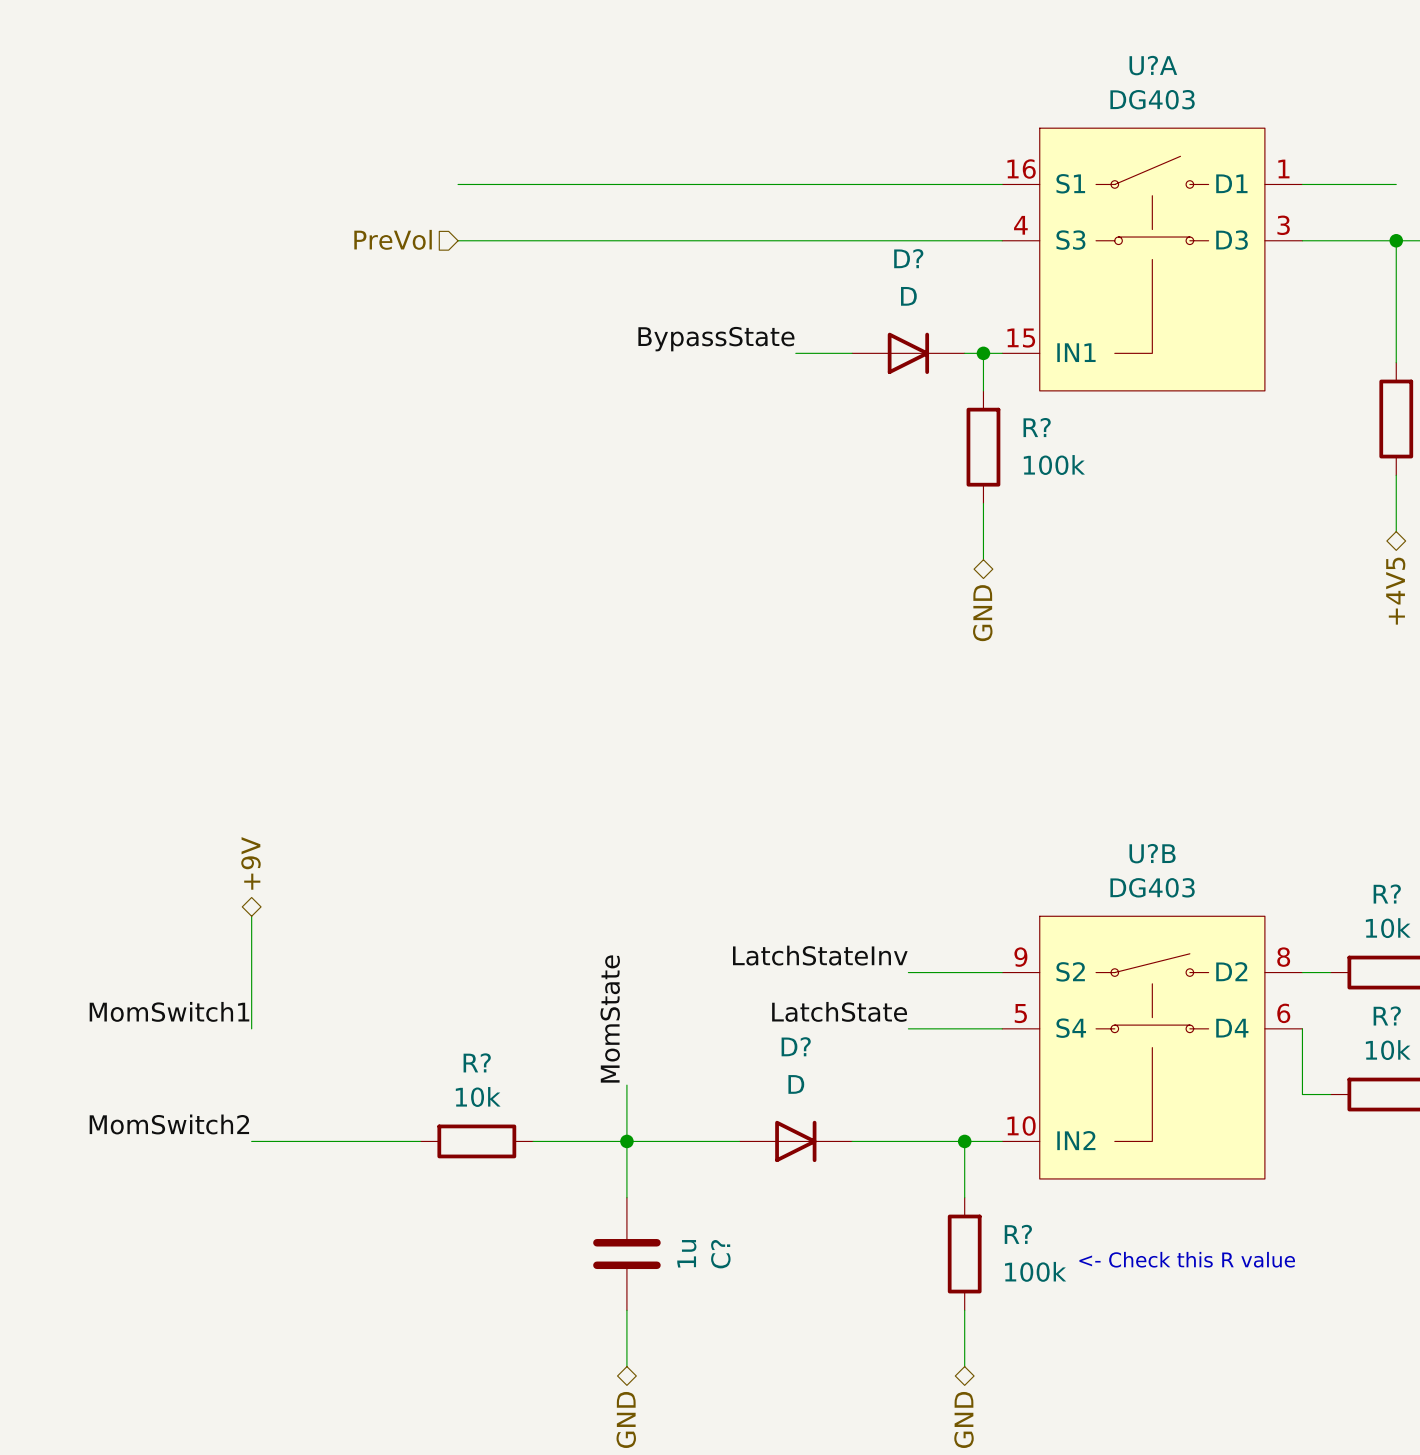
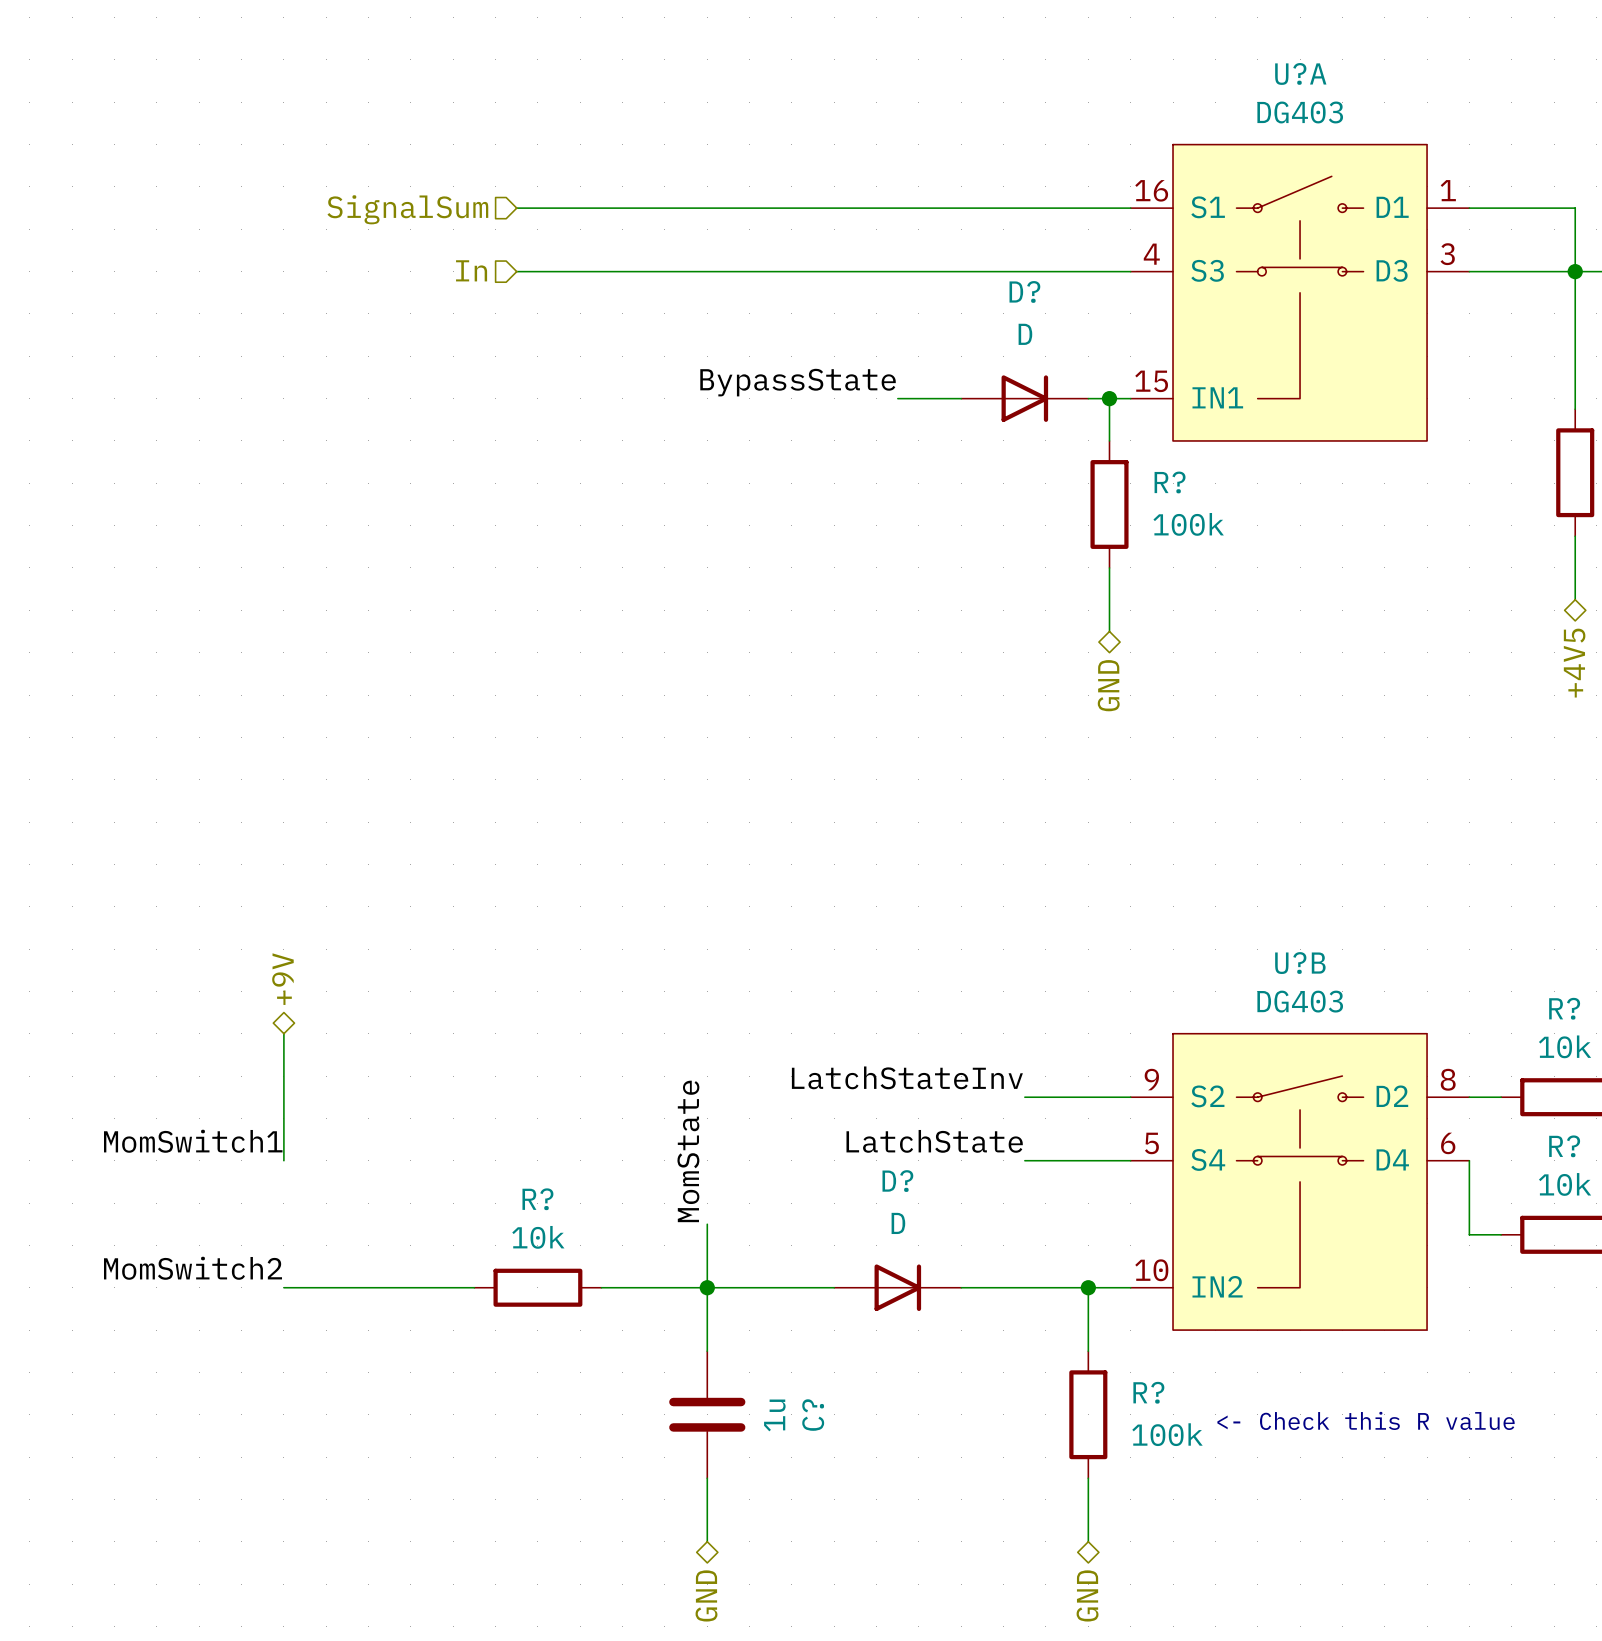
wire: none -> (1575, 208) (1575, 271)
hierarchical label: none -> SignalSum (407, 209)
hierarchical label: PreVol (393, 239) -> In (471, 270)

